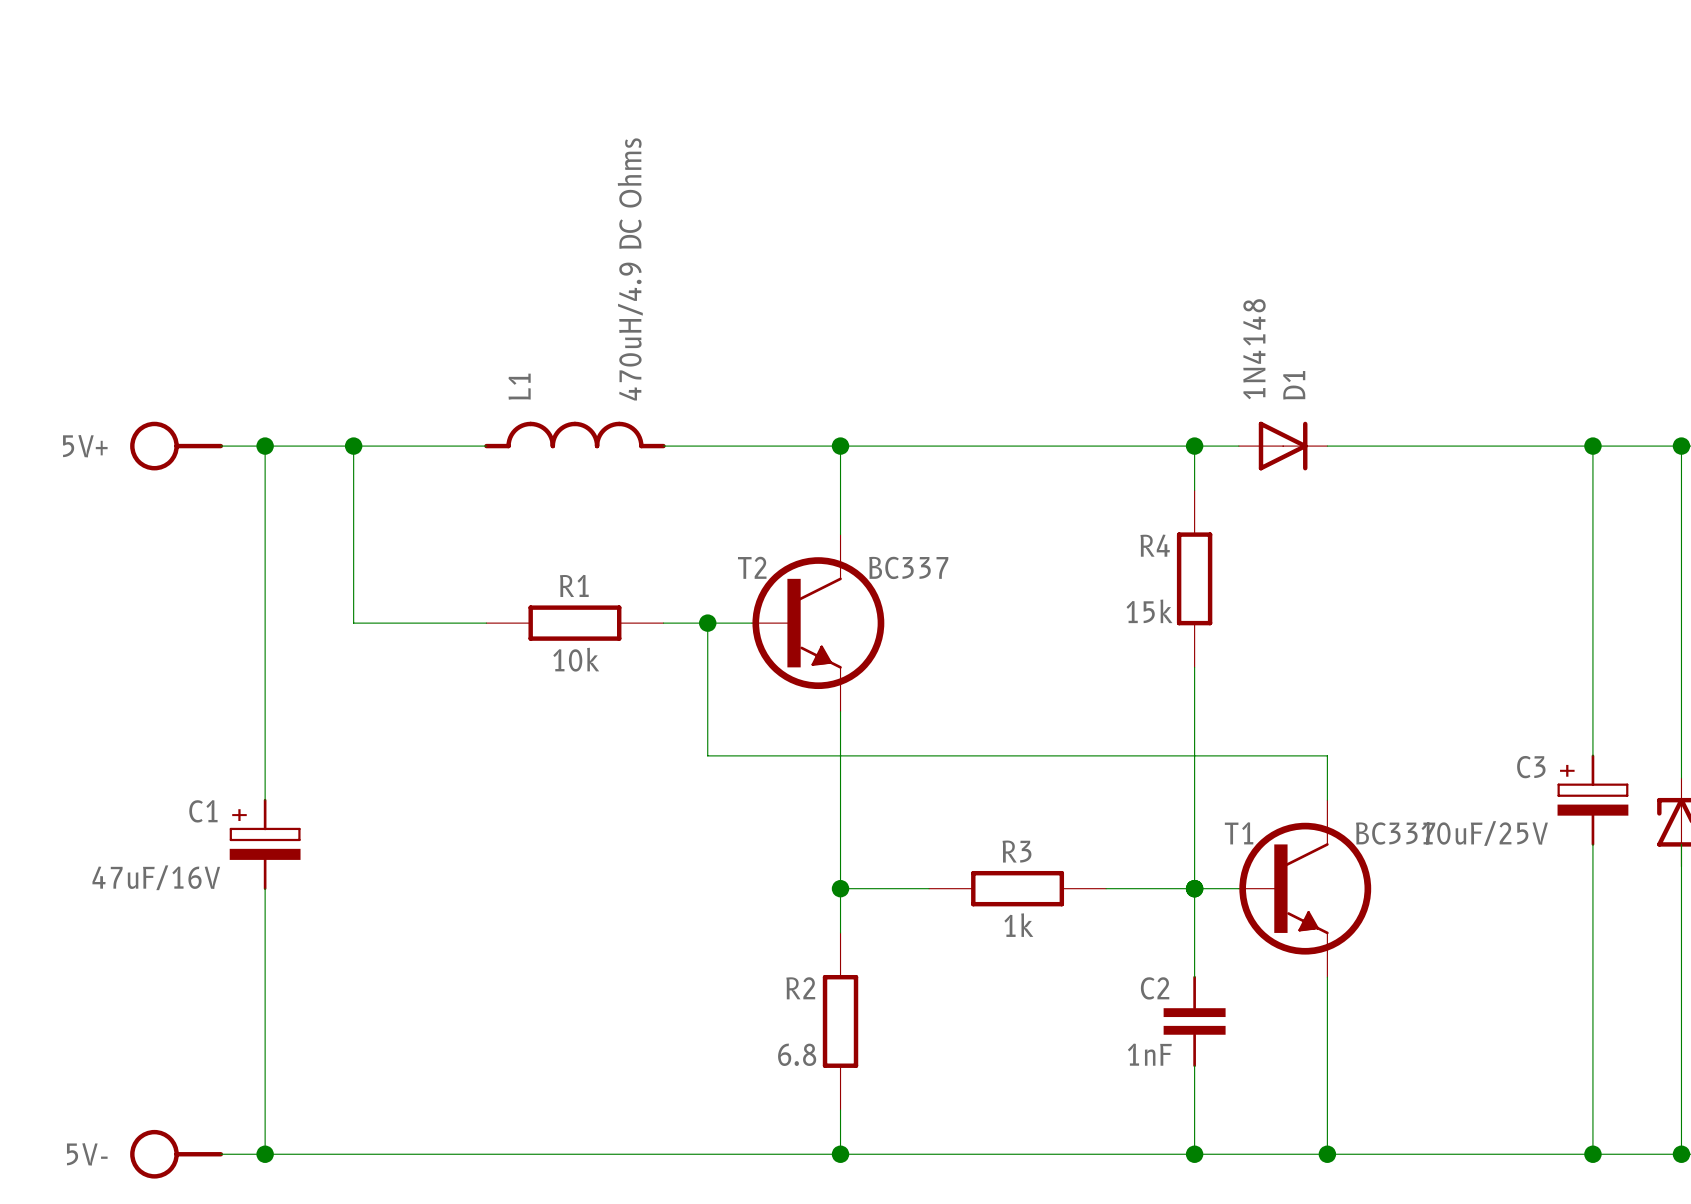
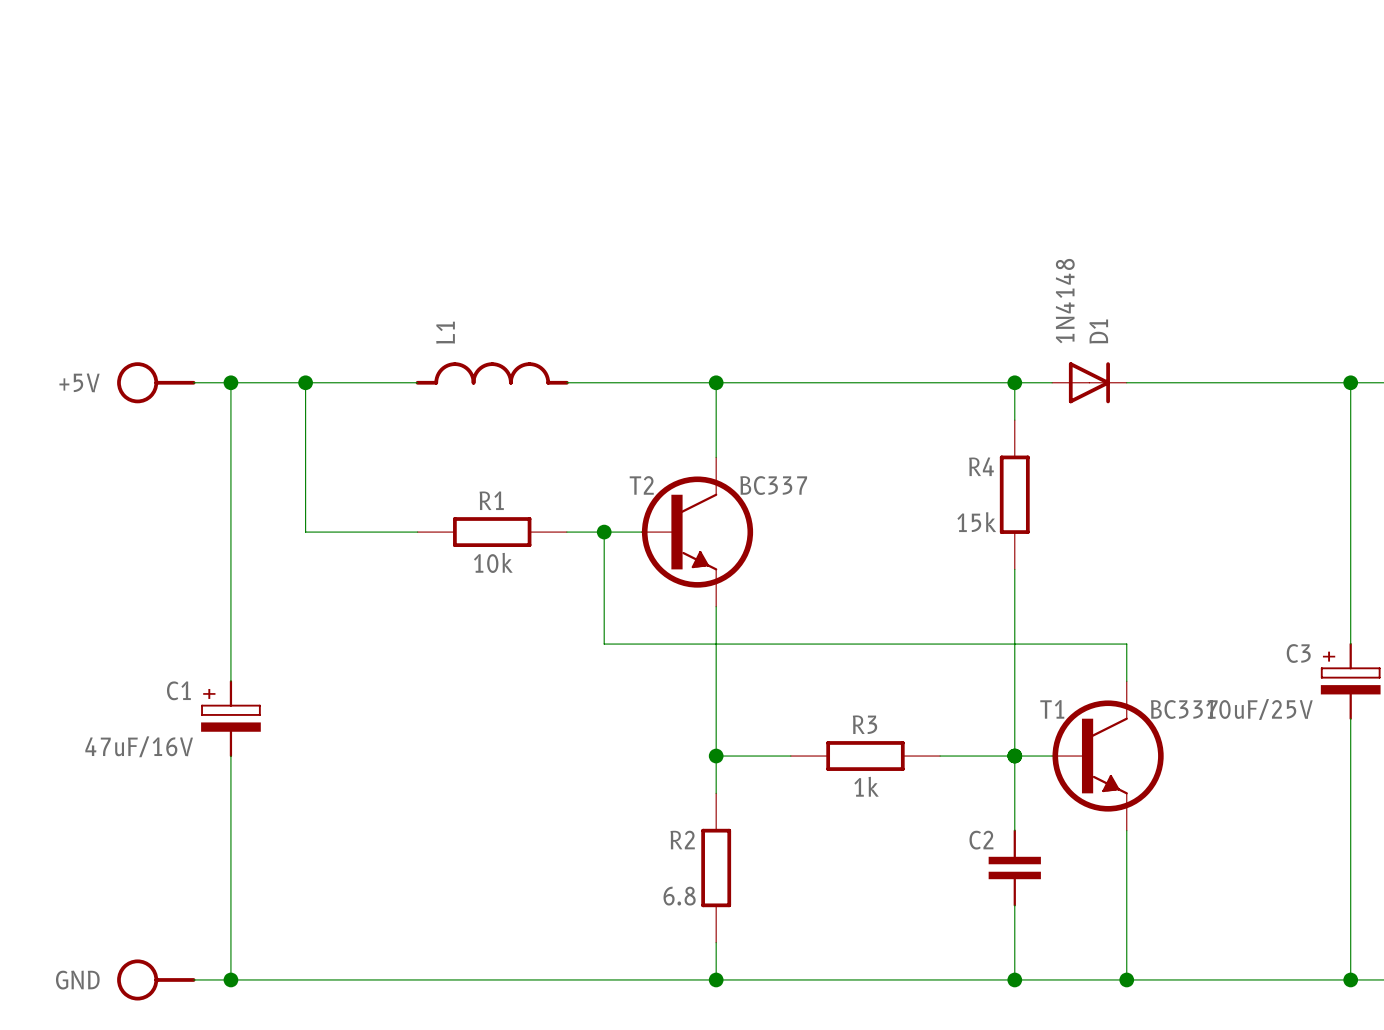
L1 value: 470uH/4.9 DC Ohms (630, 269) -> none
5V+ name: 5V+ (85, 446) -> +5V (79, 382)
C2 value: 1nF (1149, 1054) -> none
5V- name: 5V- (87, 1154) -> GND (77, 980)

